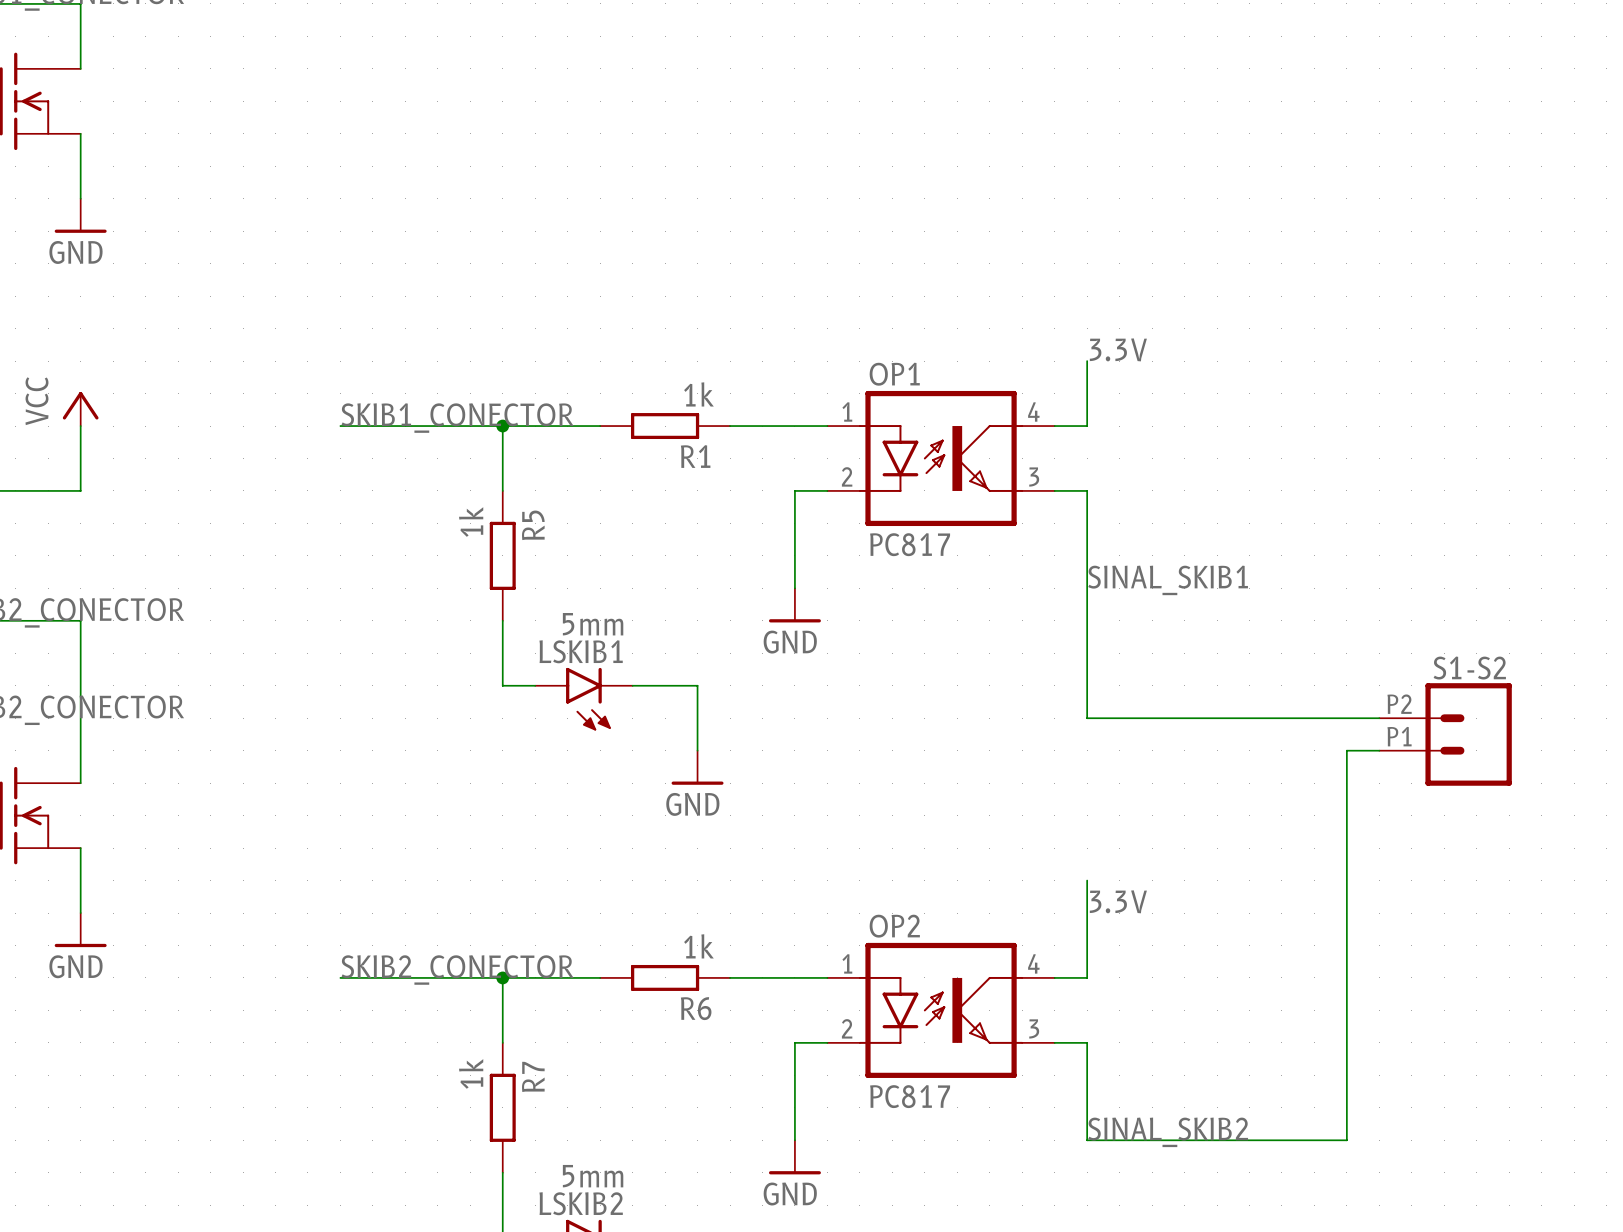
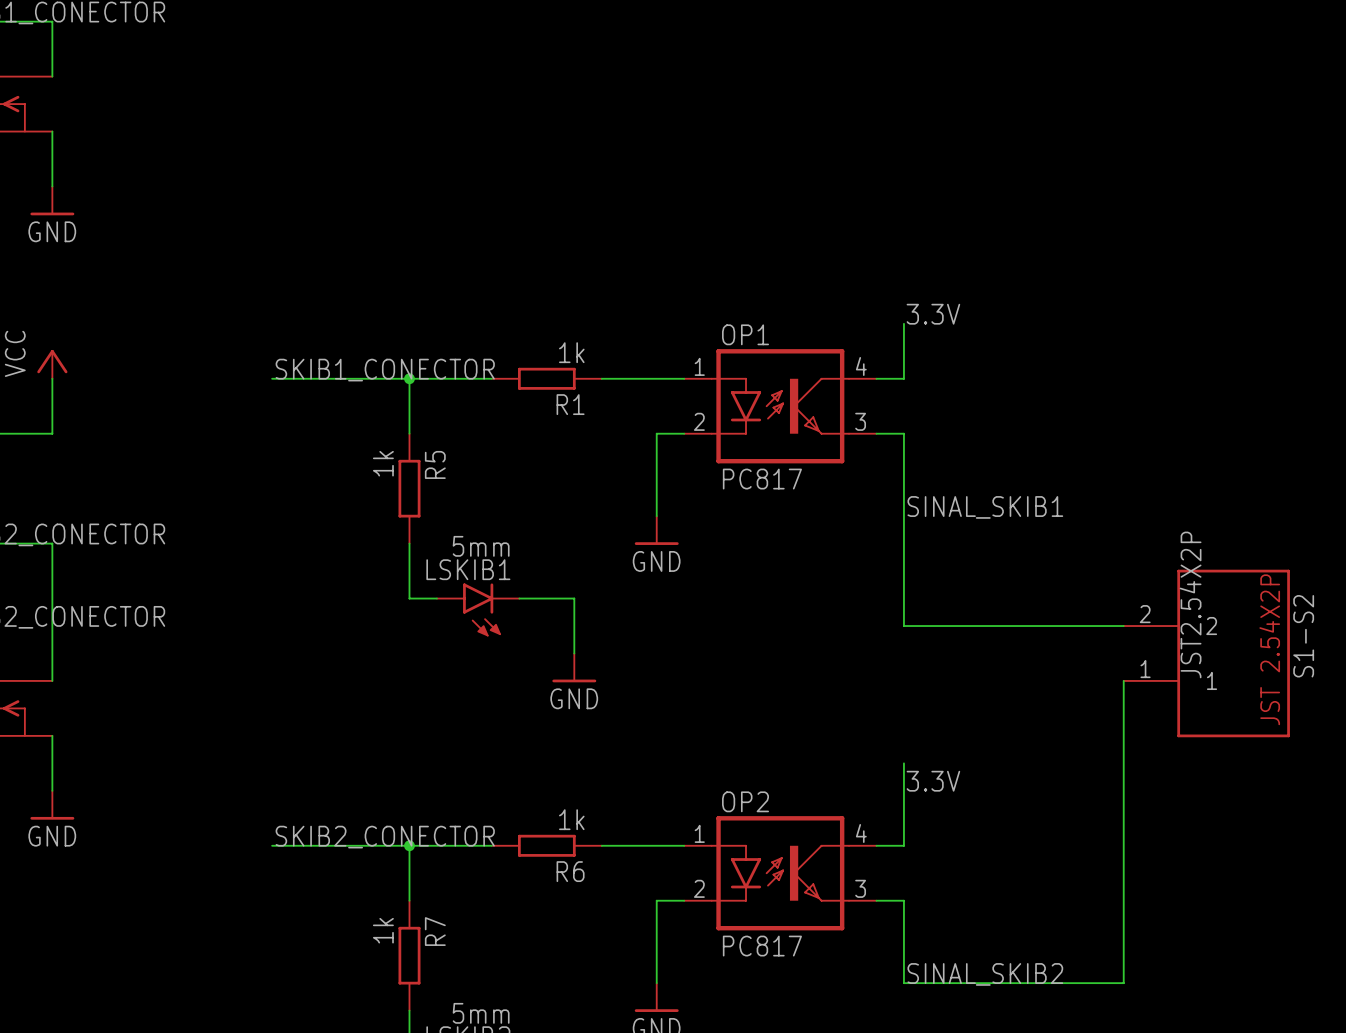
S1-S2 name position: S1-S2 (1469, 668) -> S1-S2 (1303, 636)
S1-S2 symbol: [1379, 683, 1512, 786] -> [1123, 569, 1290, 738]
S1-S2 value: none -> JST2.54X2P (1190, 604)
wire: (1379, 750) (1346, 750) (1346, 783) -> none

